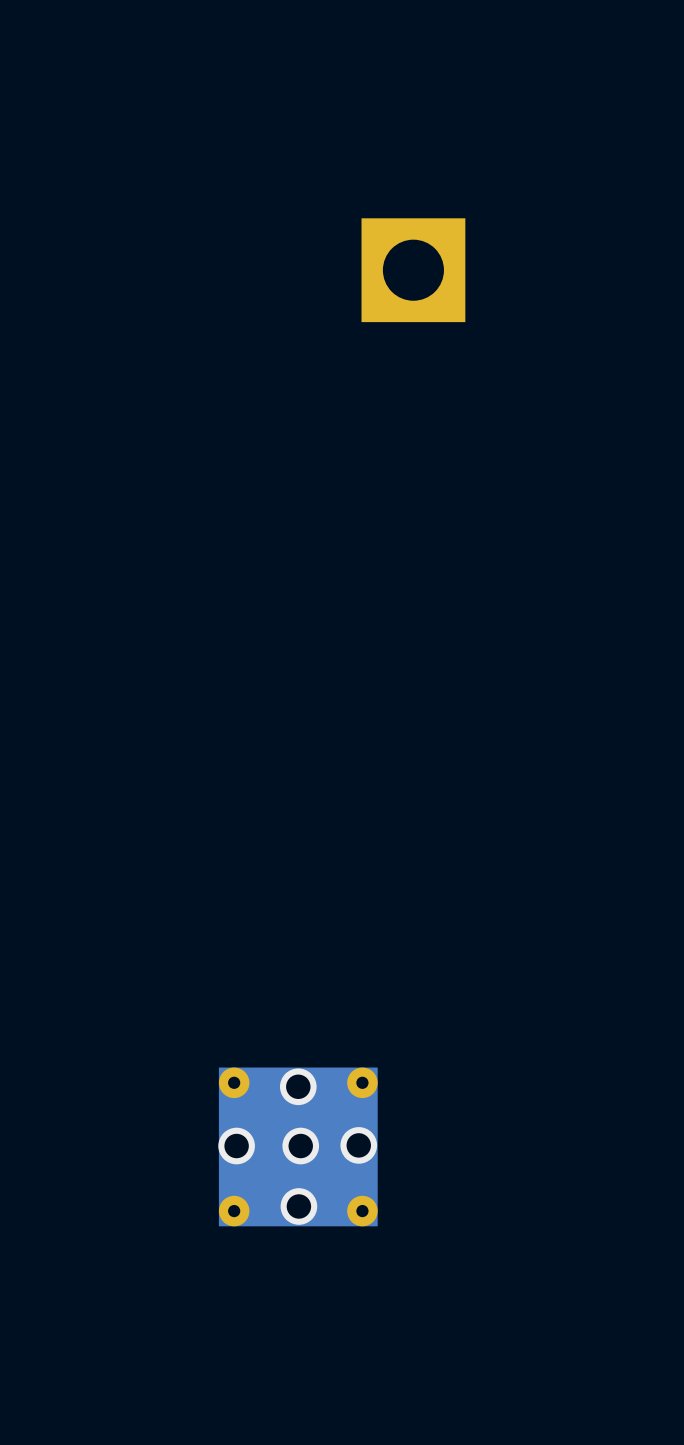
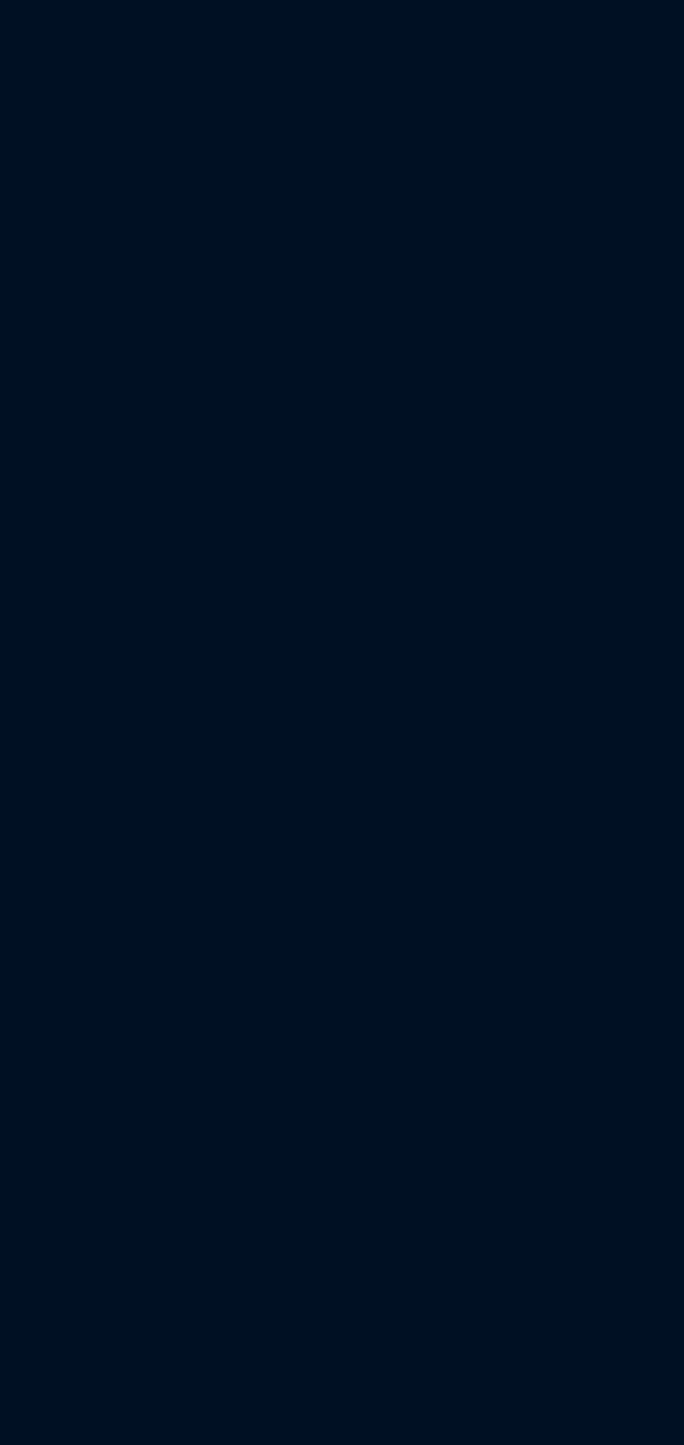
part: (413, 270) -> none
via: (298, 1086) -> none
via: (358, 1145) -> none
via: (236, 1146) -> none
part: (298, 1146) -> none
via: (300, 1146) -> none
via: (298, 1206) -> none

